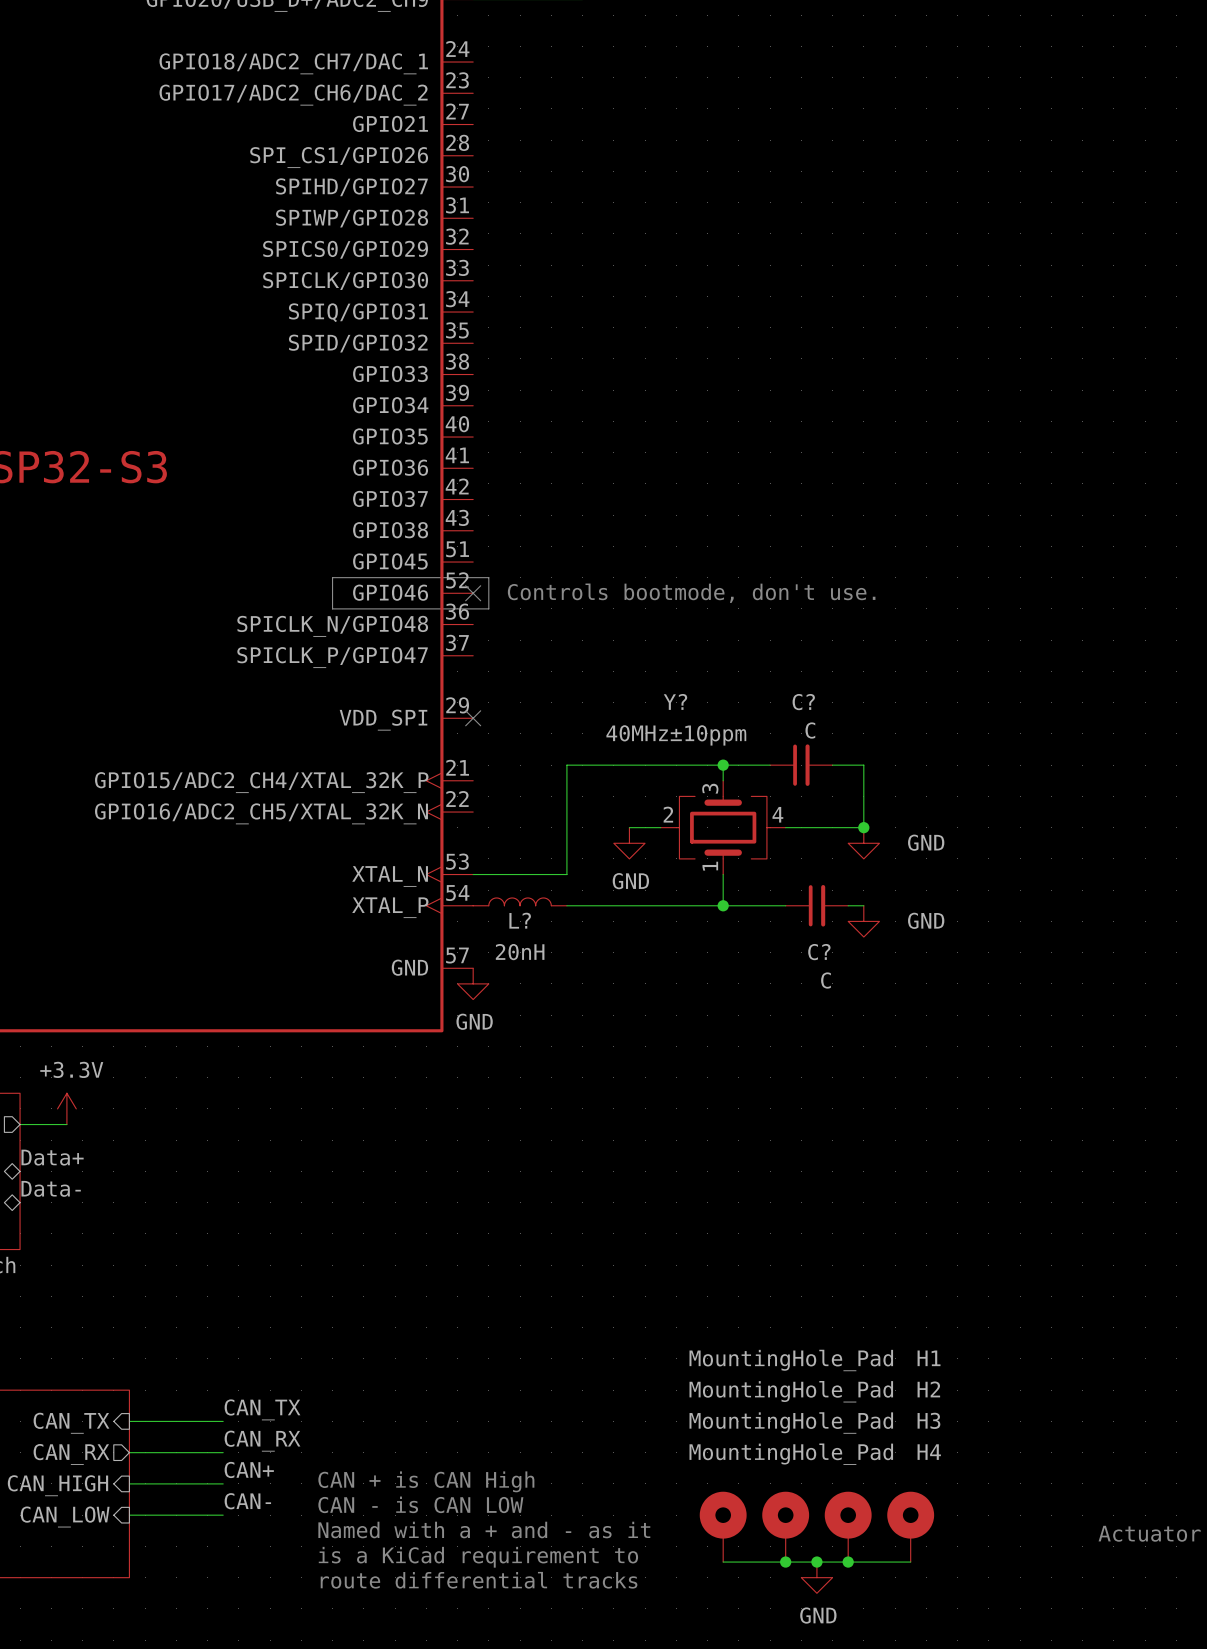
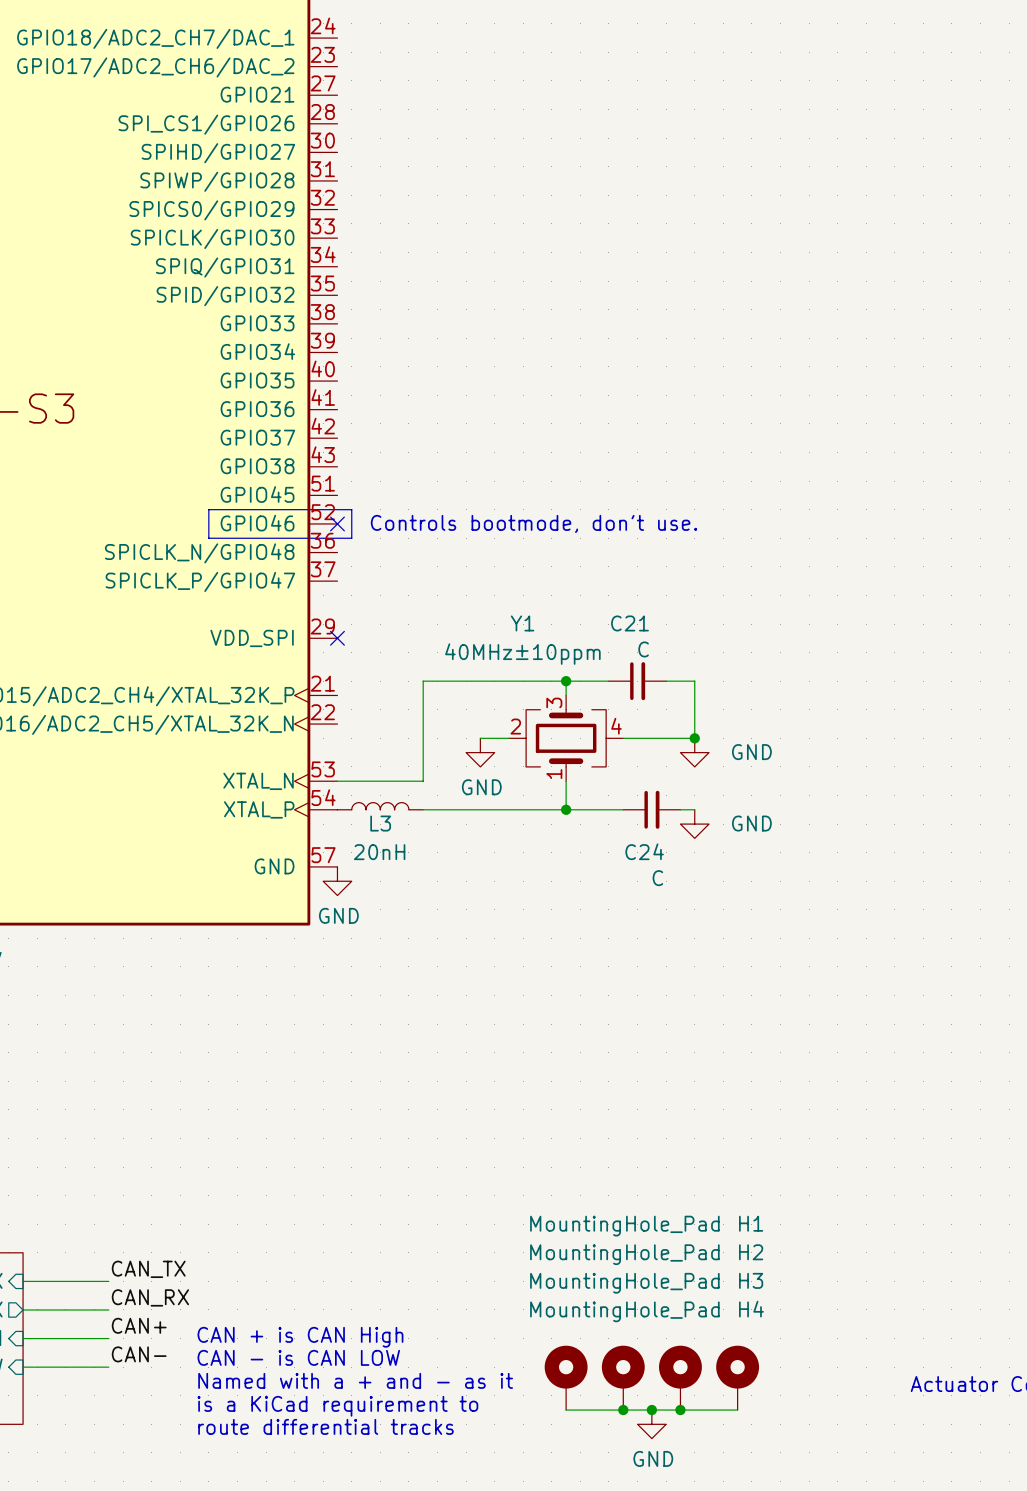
Y? name: Y? (675, 701) -> Y1 (522, 623)
C? name: C? (803, 702) -> C21 (629, 623)
L? name: L? (520, 920) -> L3 (380, 823)
C? name: C? (819, 952) -> C24 (644, 851)

